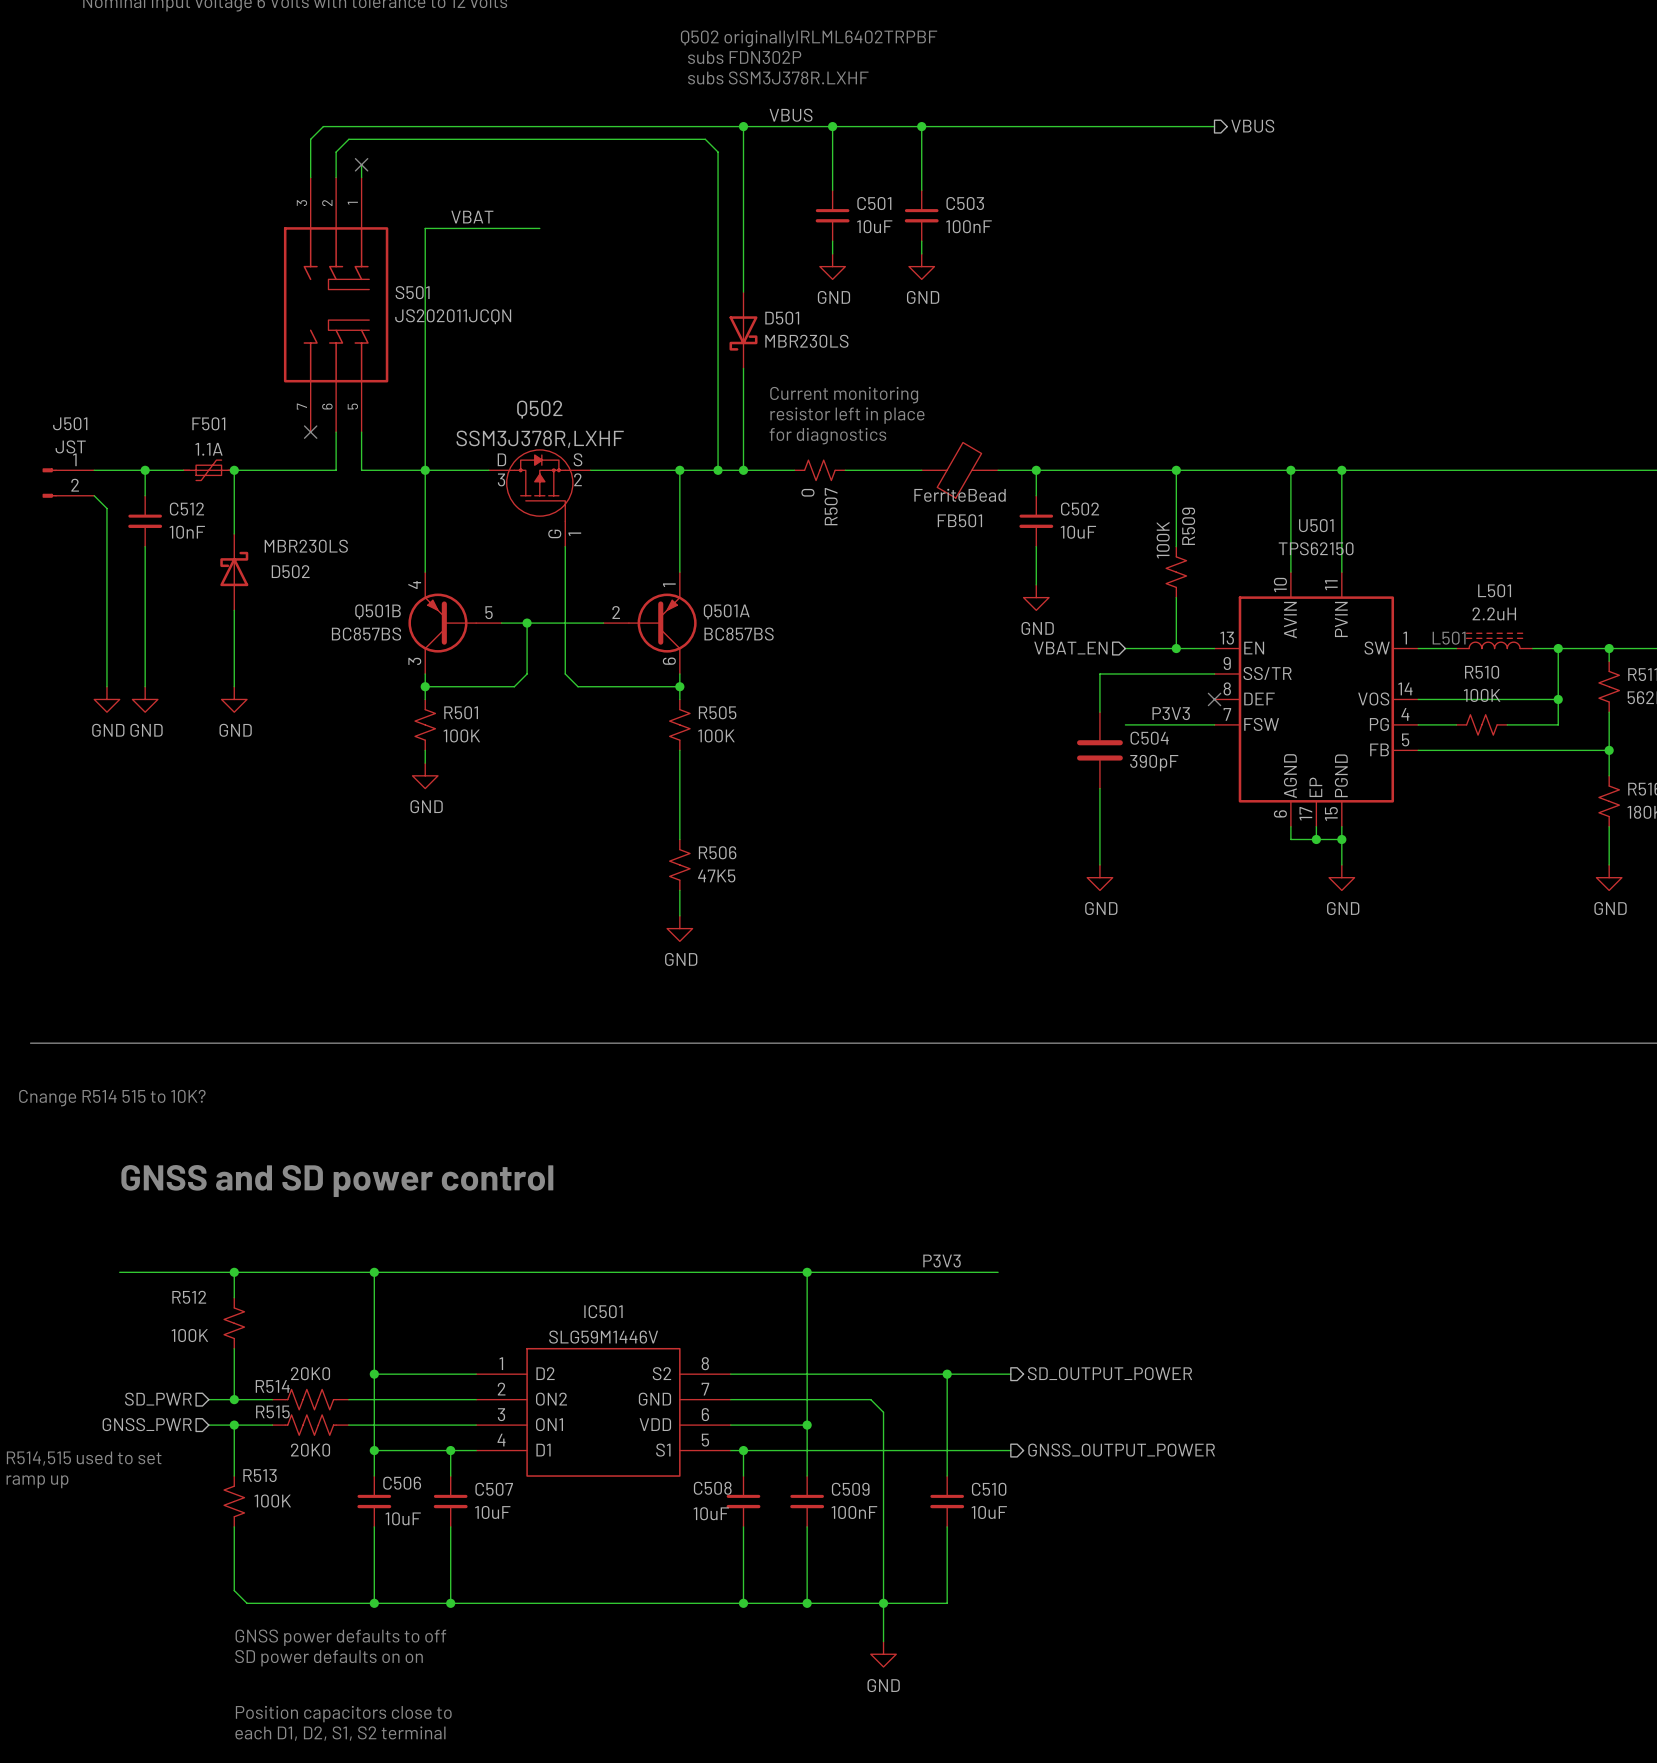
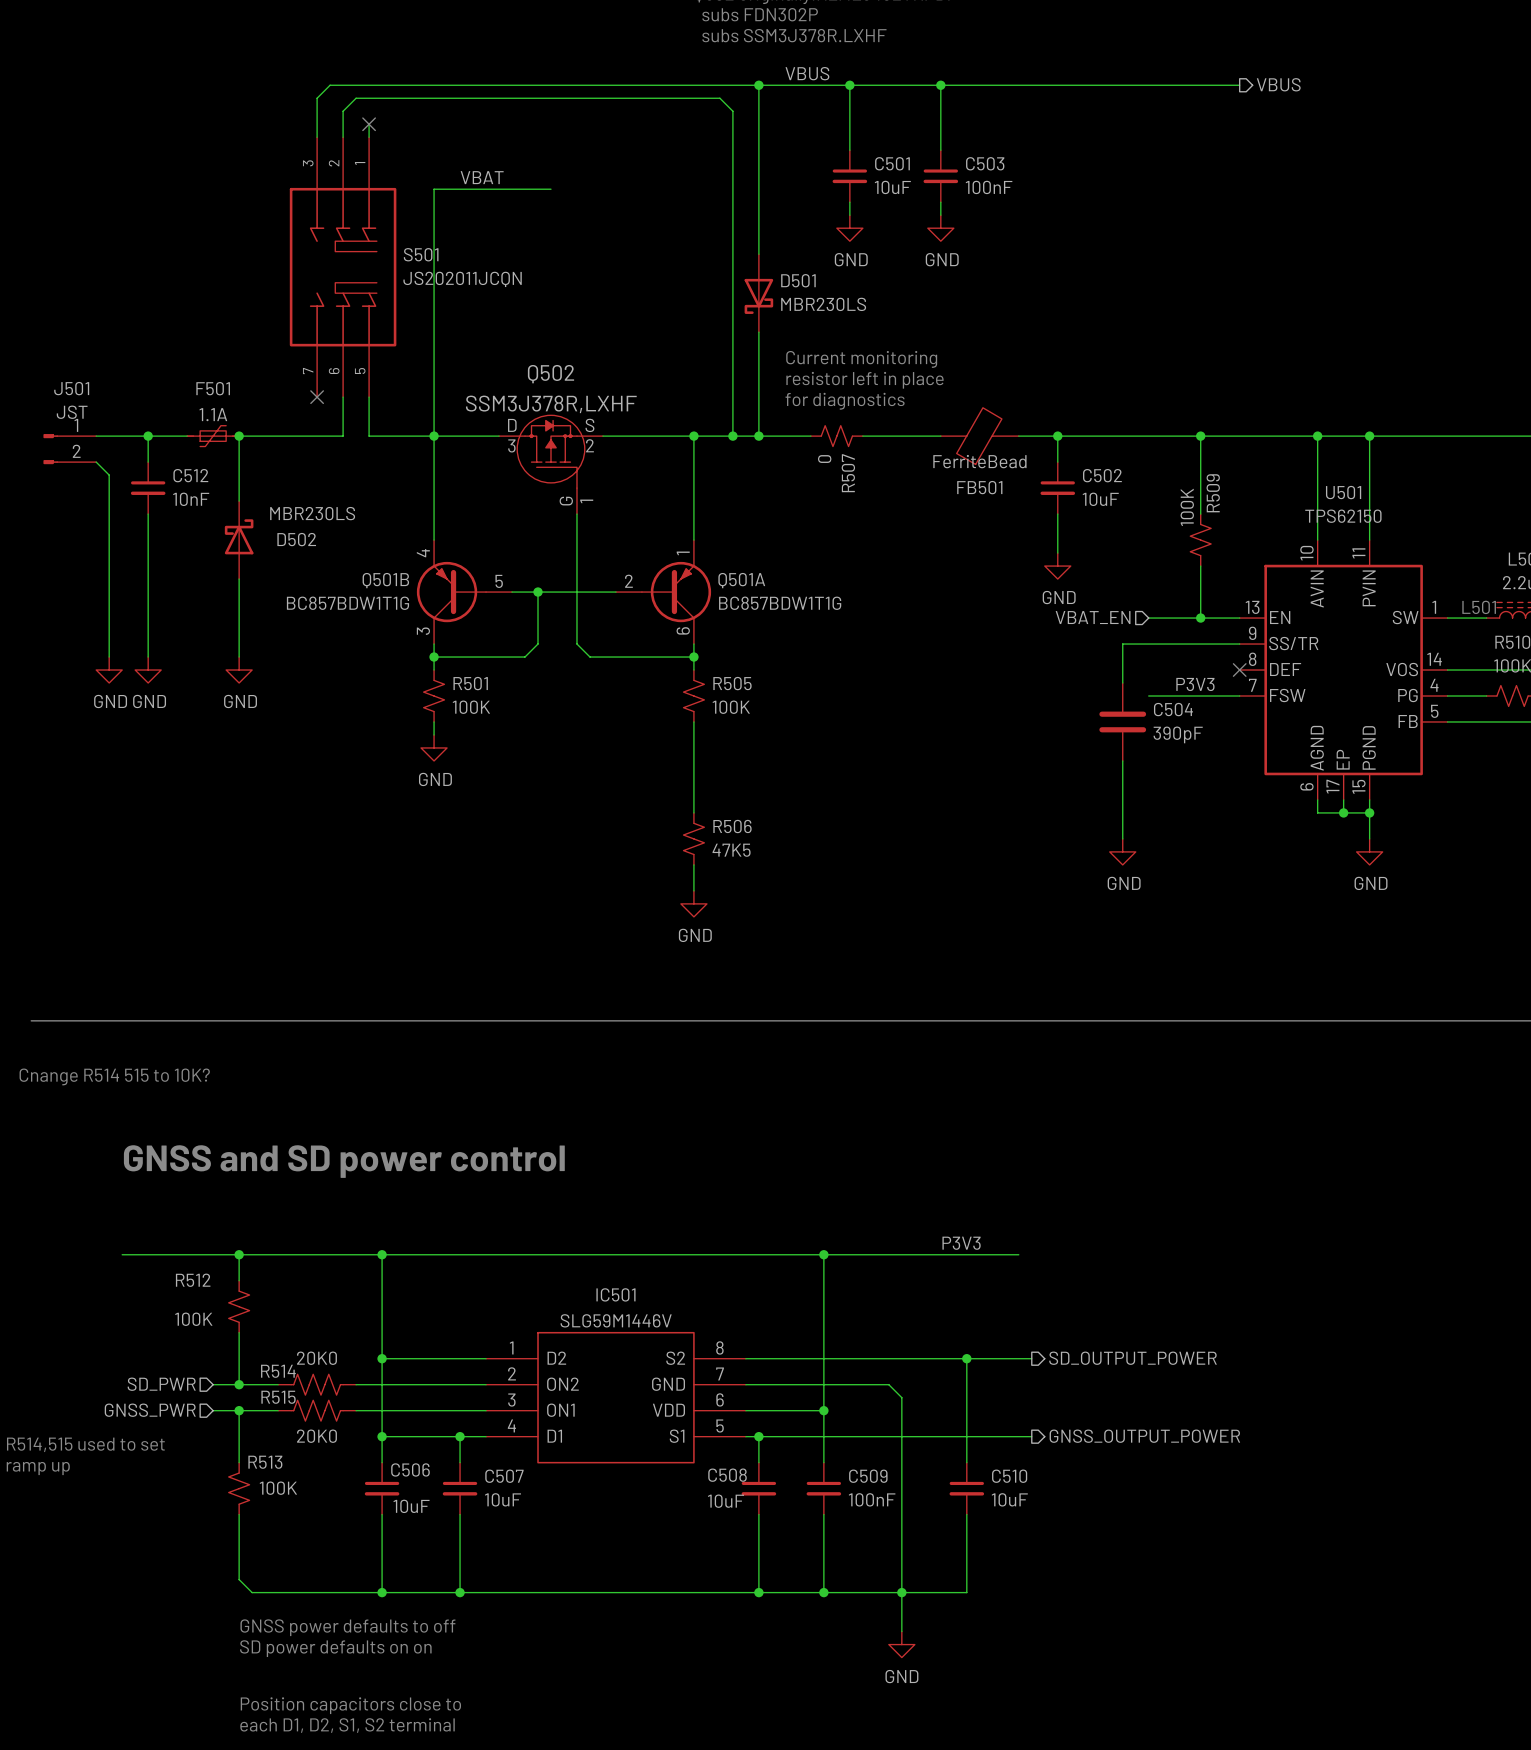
Q501B value: BC857BS (366, 634) -> BC857BDW1T1G (347, 603)
Q501A value: BC857BS (739, 634) -> BC857BDW1T1G (780, 603)

